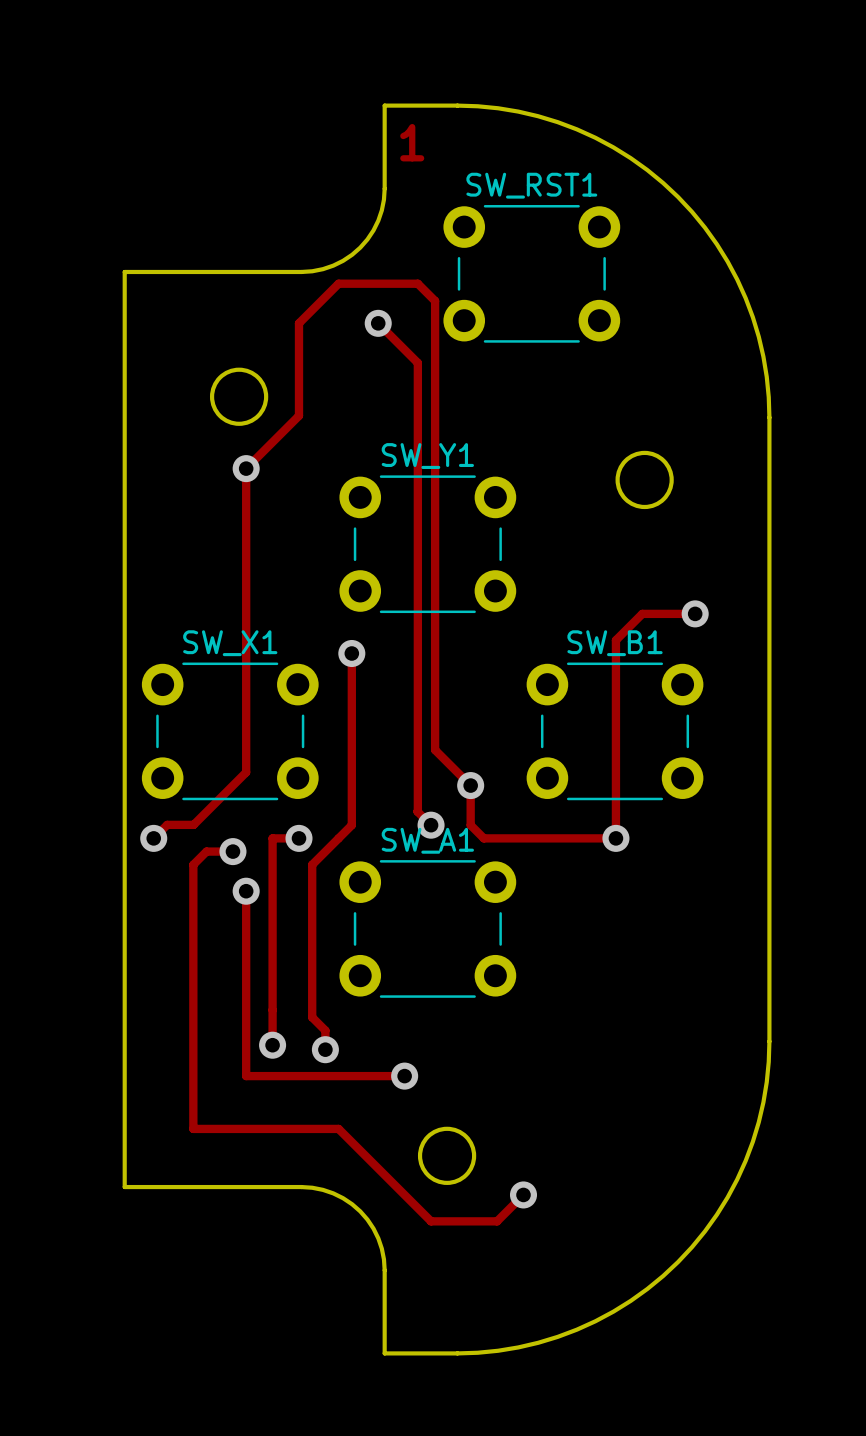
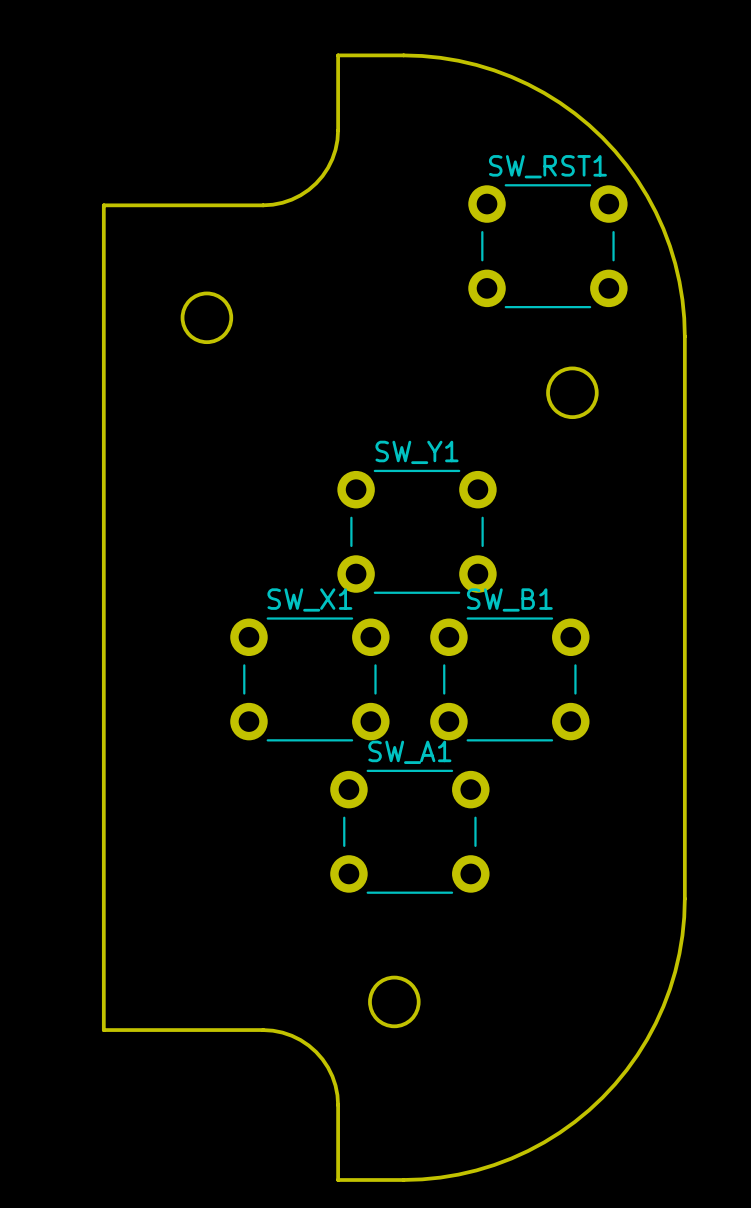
text: 1 (412, 142) -> none
SW_RST1 position: (531, 273) -> (547, 246)
track: (378, 323) (417, 362) (417, 811) (431, 825) -> none
via: (378, 323) -> none
via: (246, 468) -> none
SW_Y1 position: (427, 544) -> (417, 531)
track: (695, 613) (642, 613) (615, 640) (615, 838) (483, 838) (470, 825) (470, 785) (435, 750) (435, 300) (417, 283) (338, 283) (298, 323) (298, 415) (246, 468) (246, 772) (193, 824) (167, 824) (153, 838) -> none
via: (695, 613) -> none
track: (351, 653) (351, 825) (312, 864) (312, 1017) (325, 1030) (325, 1049) -> none
via: (351, 653) -> none
SW_X1 position: (230, 731) -> (309, 679)
SW_B1 position: (615, 731) -> (509, 679)
via: (470, 785) -> none
via: (431, 825) -> none
via: (153, 838) -> none
track: (298, 838) (272, 838) (272, 1045) -> none
via: (298, 838) -> none
via: (615, 838) -> none
track: (232, 851) (206, 851) (193, 864) (193, 1128) (338, 1128) (431, 1221) (497, 1221) (523, 1194) -> none
via: (232, 851) -> none
track: (246, 891) (246, 1076) (404, 1076) -> none
via: (246, 891) -> none
SW_A1 position: (427, 928) -> (409, 831)
via: (272, 1045) -> none
via: (325, 1049) -> none
via: (404, 1076) -> none
via: (523, 1194) -> none

